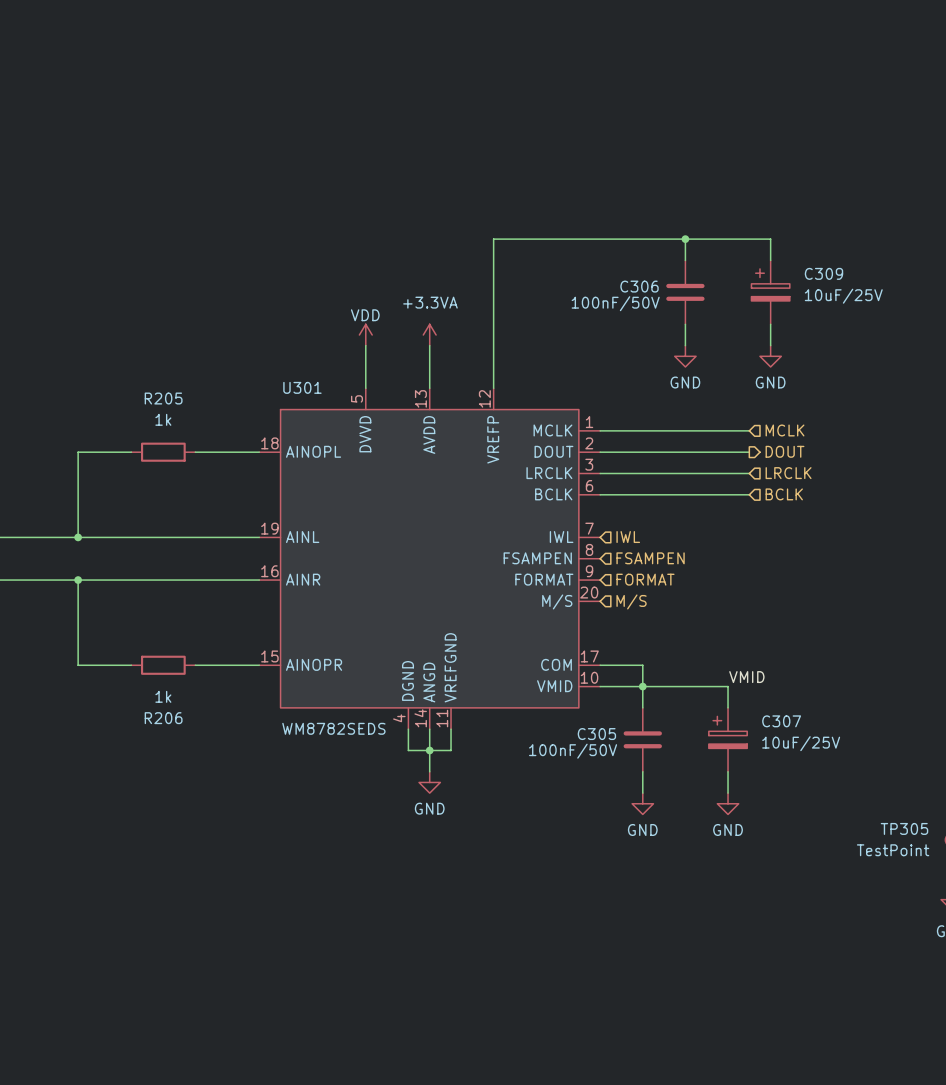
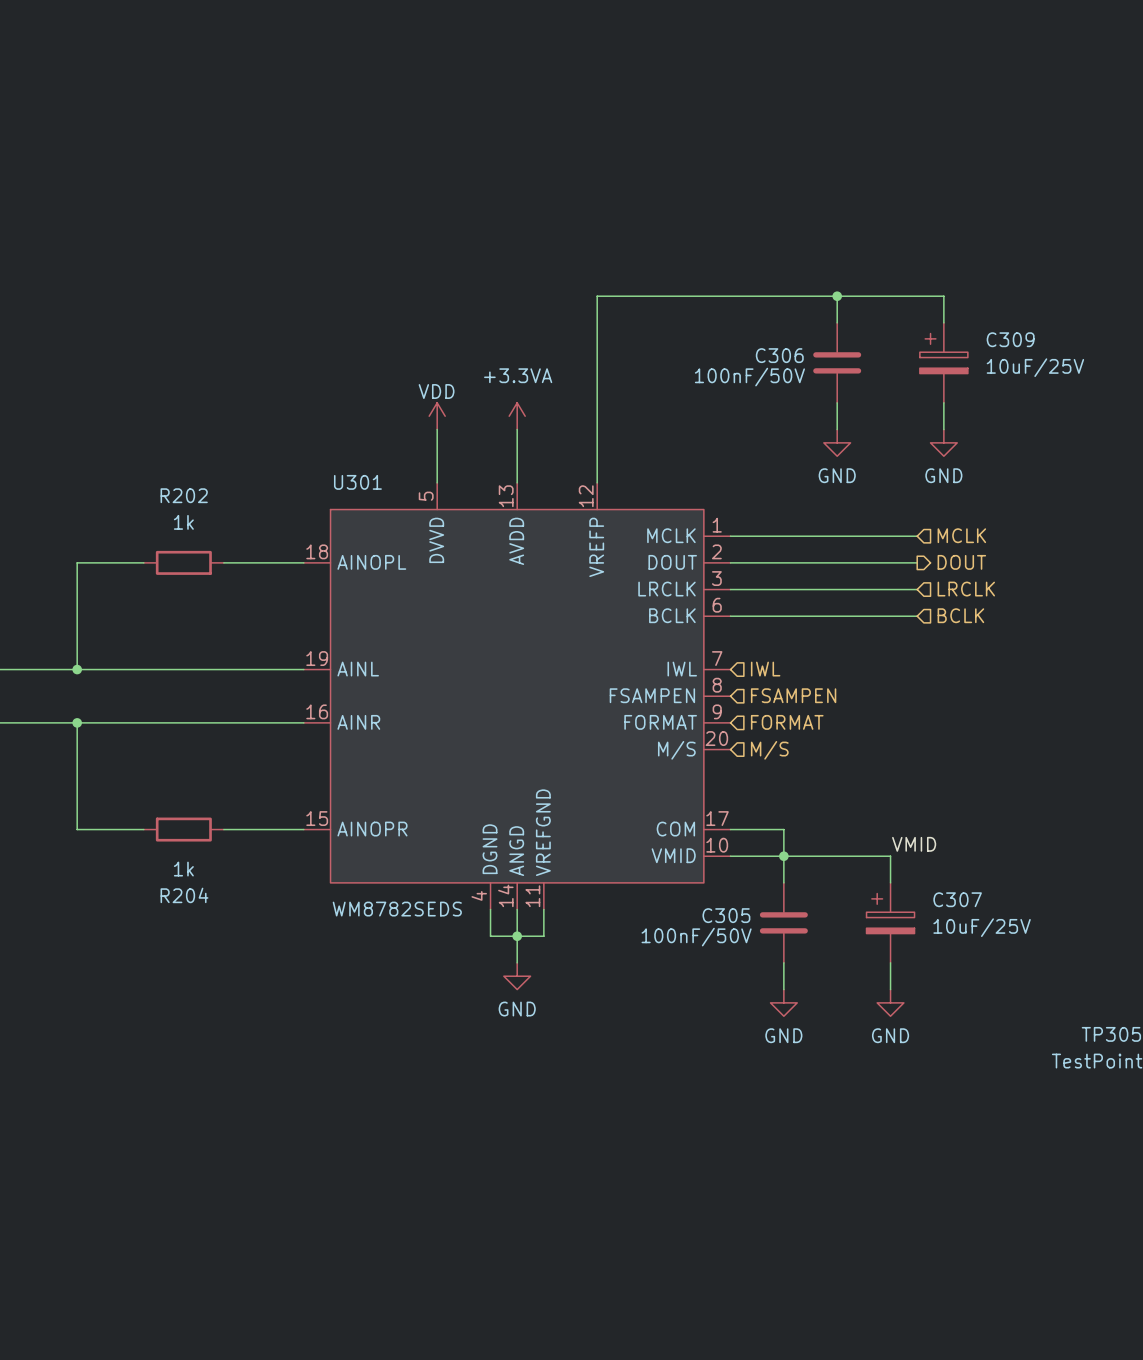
R205 name: R205 (163, 398) -> R202 (184, 495)
R206 name: R206 (163, 718) -> R204 (184, 895)

